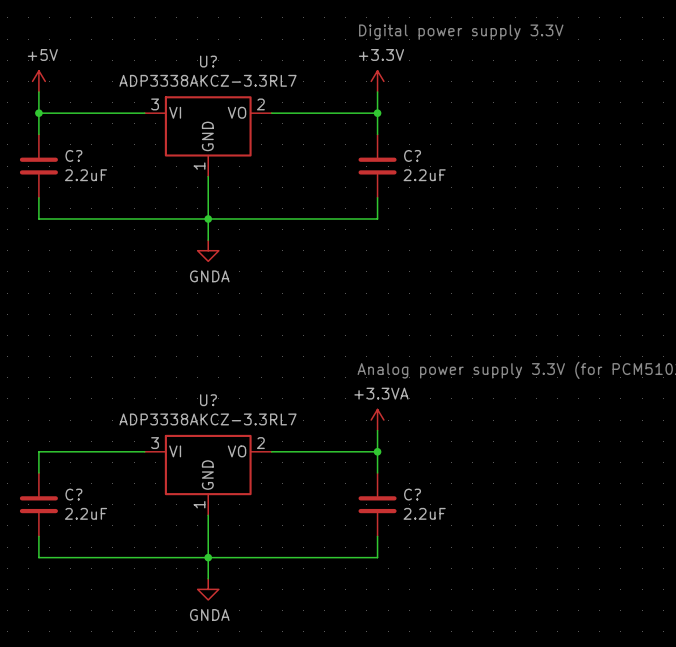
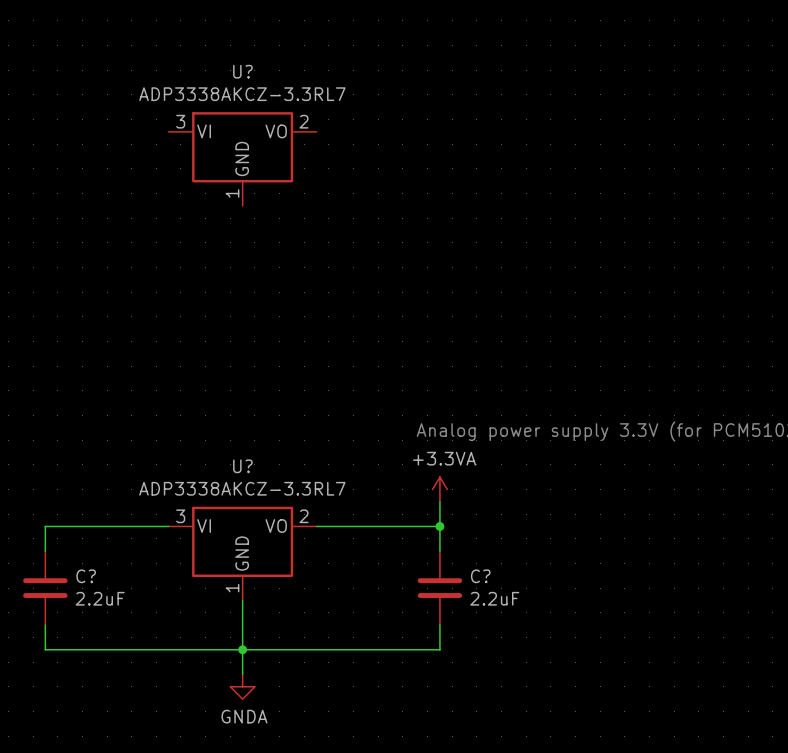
text: Digital power supply 3.3V (461, 32) -> none
power symbol: +5V (38, 81) -> none
power symbol: +3.3V (377, 81) -> none
wire: (38, 92) (38, 134) -> none
wire: (377, 92) (377, 134) -> none
wire: (38, 113) (144, 113) -> none
junction: (38, 113) -> none
wire: (271, 113) (377, 113) -> none
junction: (377, 113) -> none
C?: 2.2uF (38, 166) -> none
C?: 2.2uF (377, 166) -> none
wire: (208, 176) (208, 240) -> none
wire: (38, 197) (38, 218) (377, 218) (377, 197) -> none
junction: (208, 218) -> none
power symbol: GNDA (208, 250) -> none

